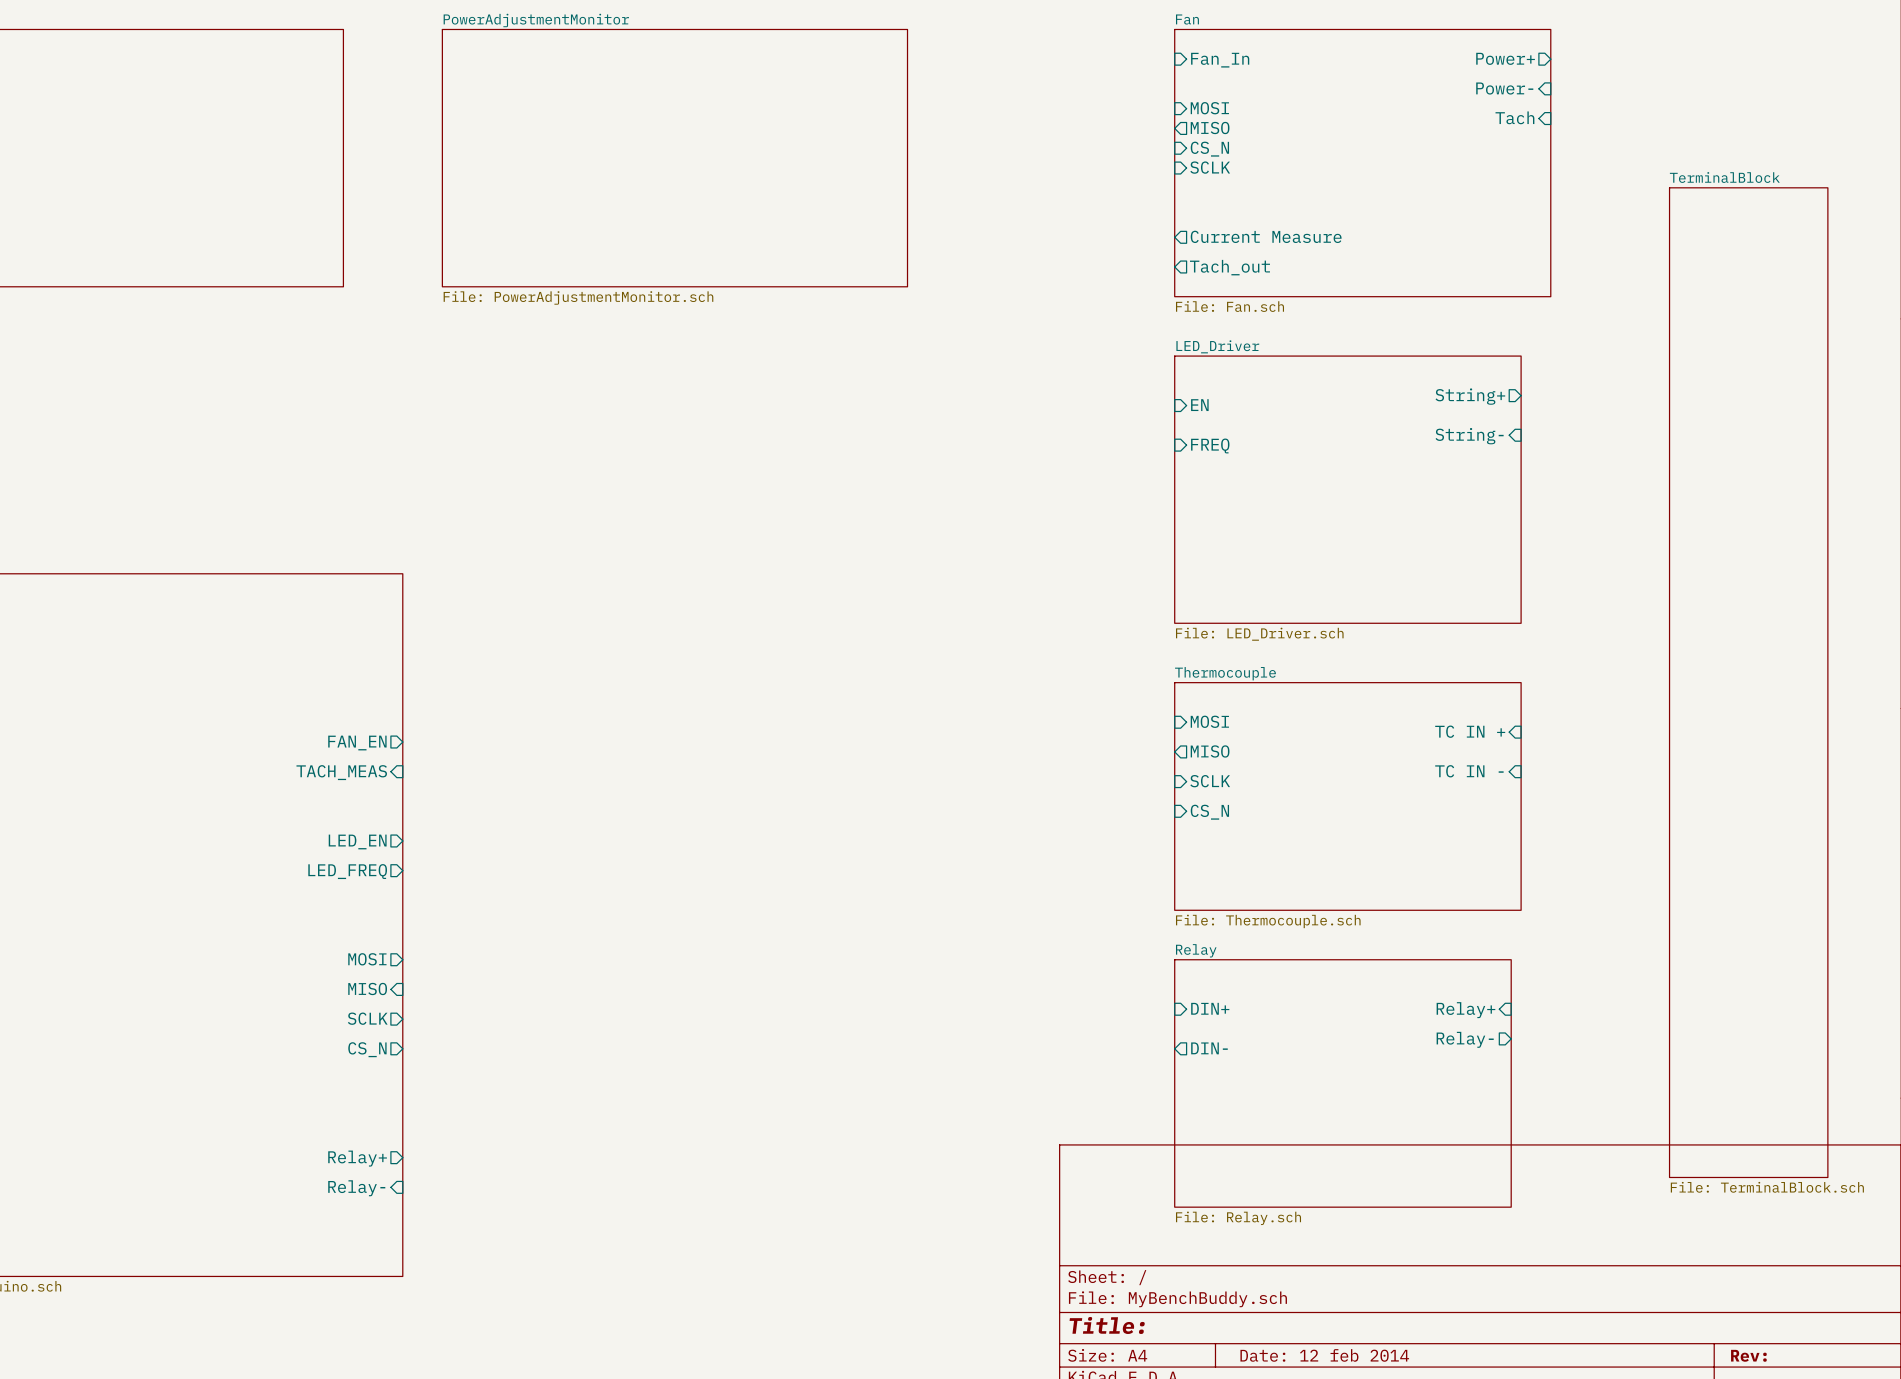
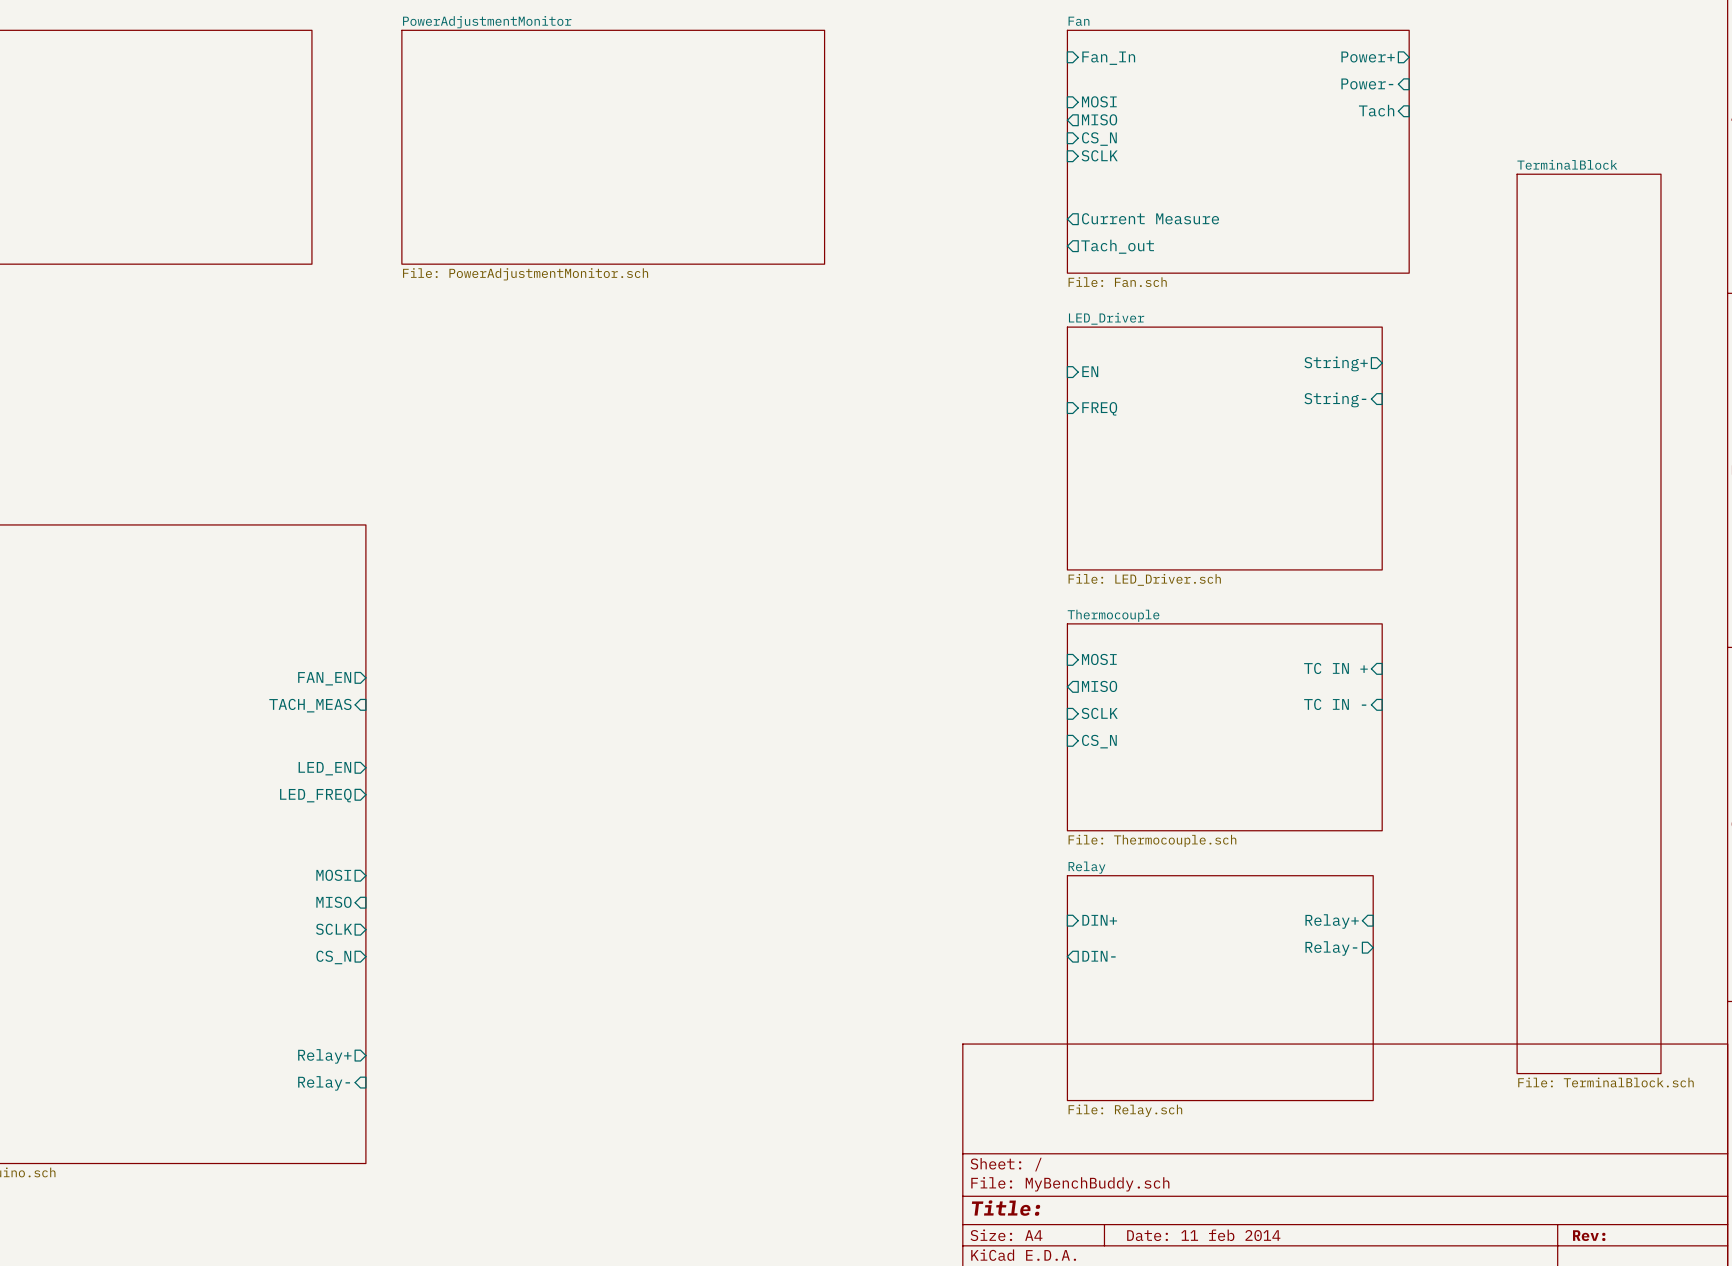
title block: Date: 12 feb 2014 (1324, 1355) -> Date: 11 feb 2014 (1203, 1235)

